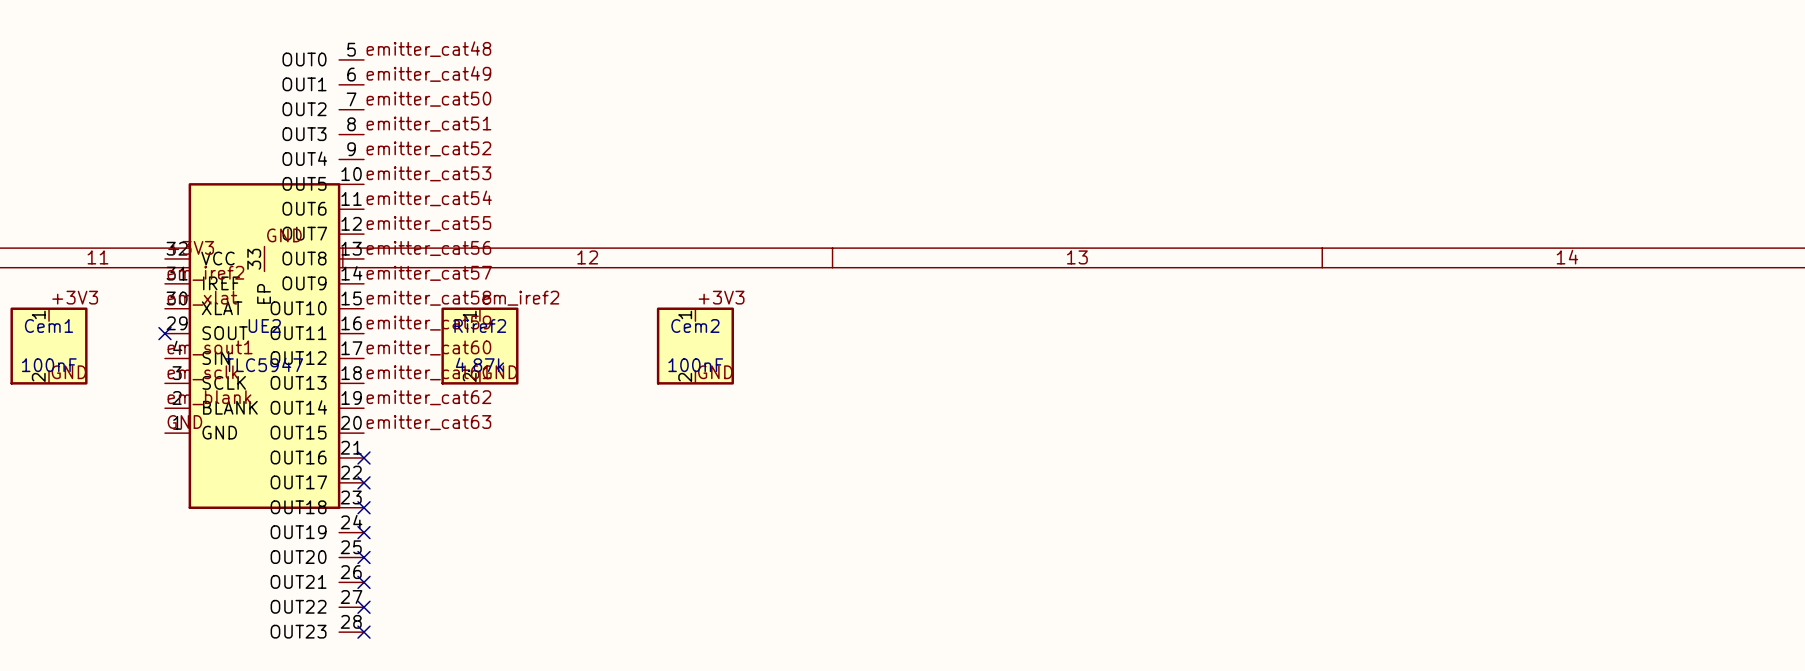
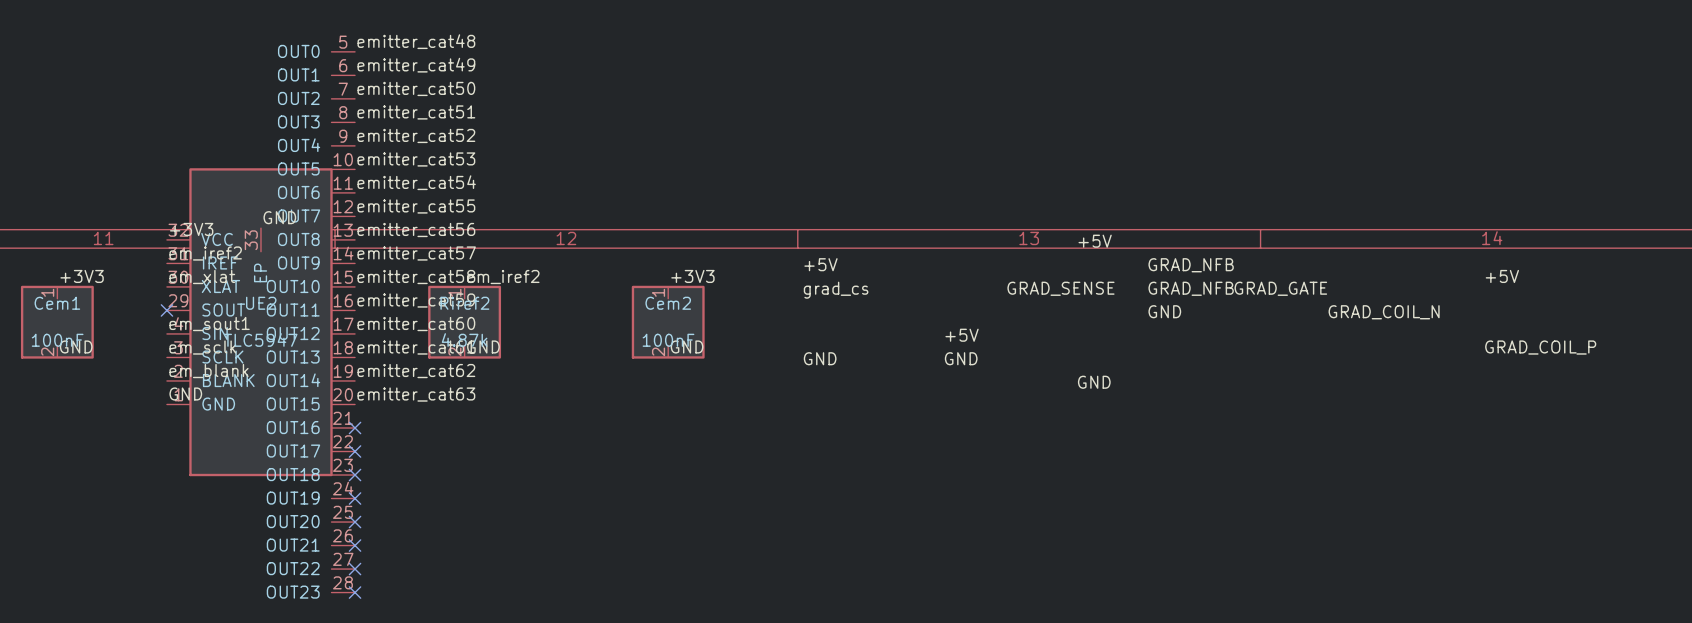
label: none -> +5V (1095, 241)
label: none -> +5V (820, 264)
label: none -> GRAD_NFB (1191, 265)
label: none -> +5V (1502, 276)
label: none -> GRAD_SENSE (1060, 288)
label: none -> GRAD_NFB (1191, 288)
label: none -> GRAD_GATE (1280, 288)
label: none -> grad_cs (836, 290)
label: none -> GND (1164, 311)
label: none -> GRAD_COIL_N (1384, 312)
label: none -> +5V (962, 335)
label: none -> GRAD_COIL_P (1540, 347)
label: none -> GND (820, 358)
label: none -> GND (961, 358)
label: none -> GND (1094, 382)

